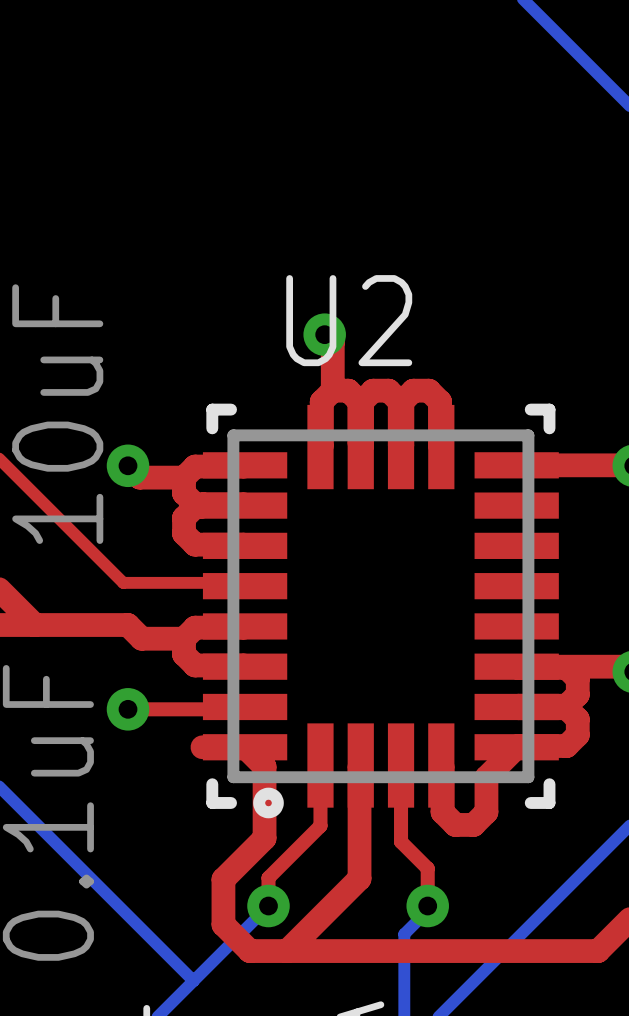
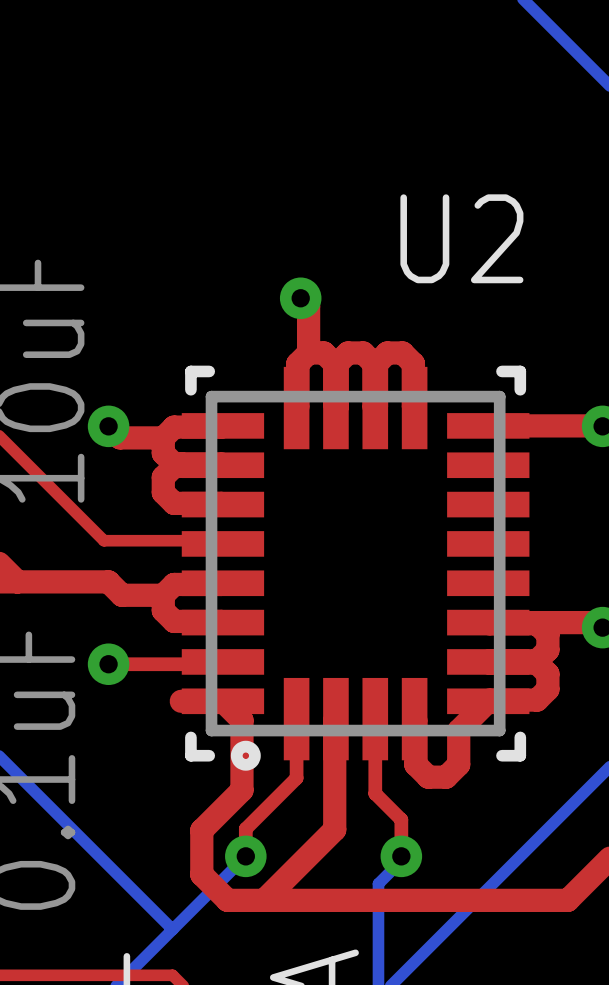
U2 name position: U2 (349, 320) -> U2 (461, 238)

